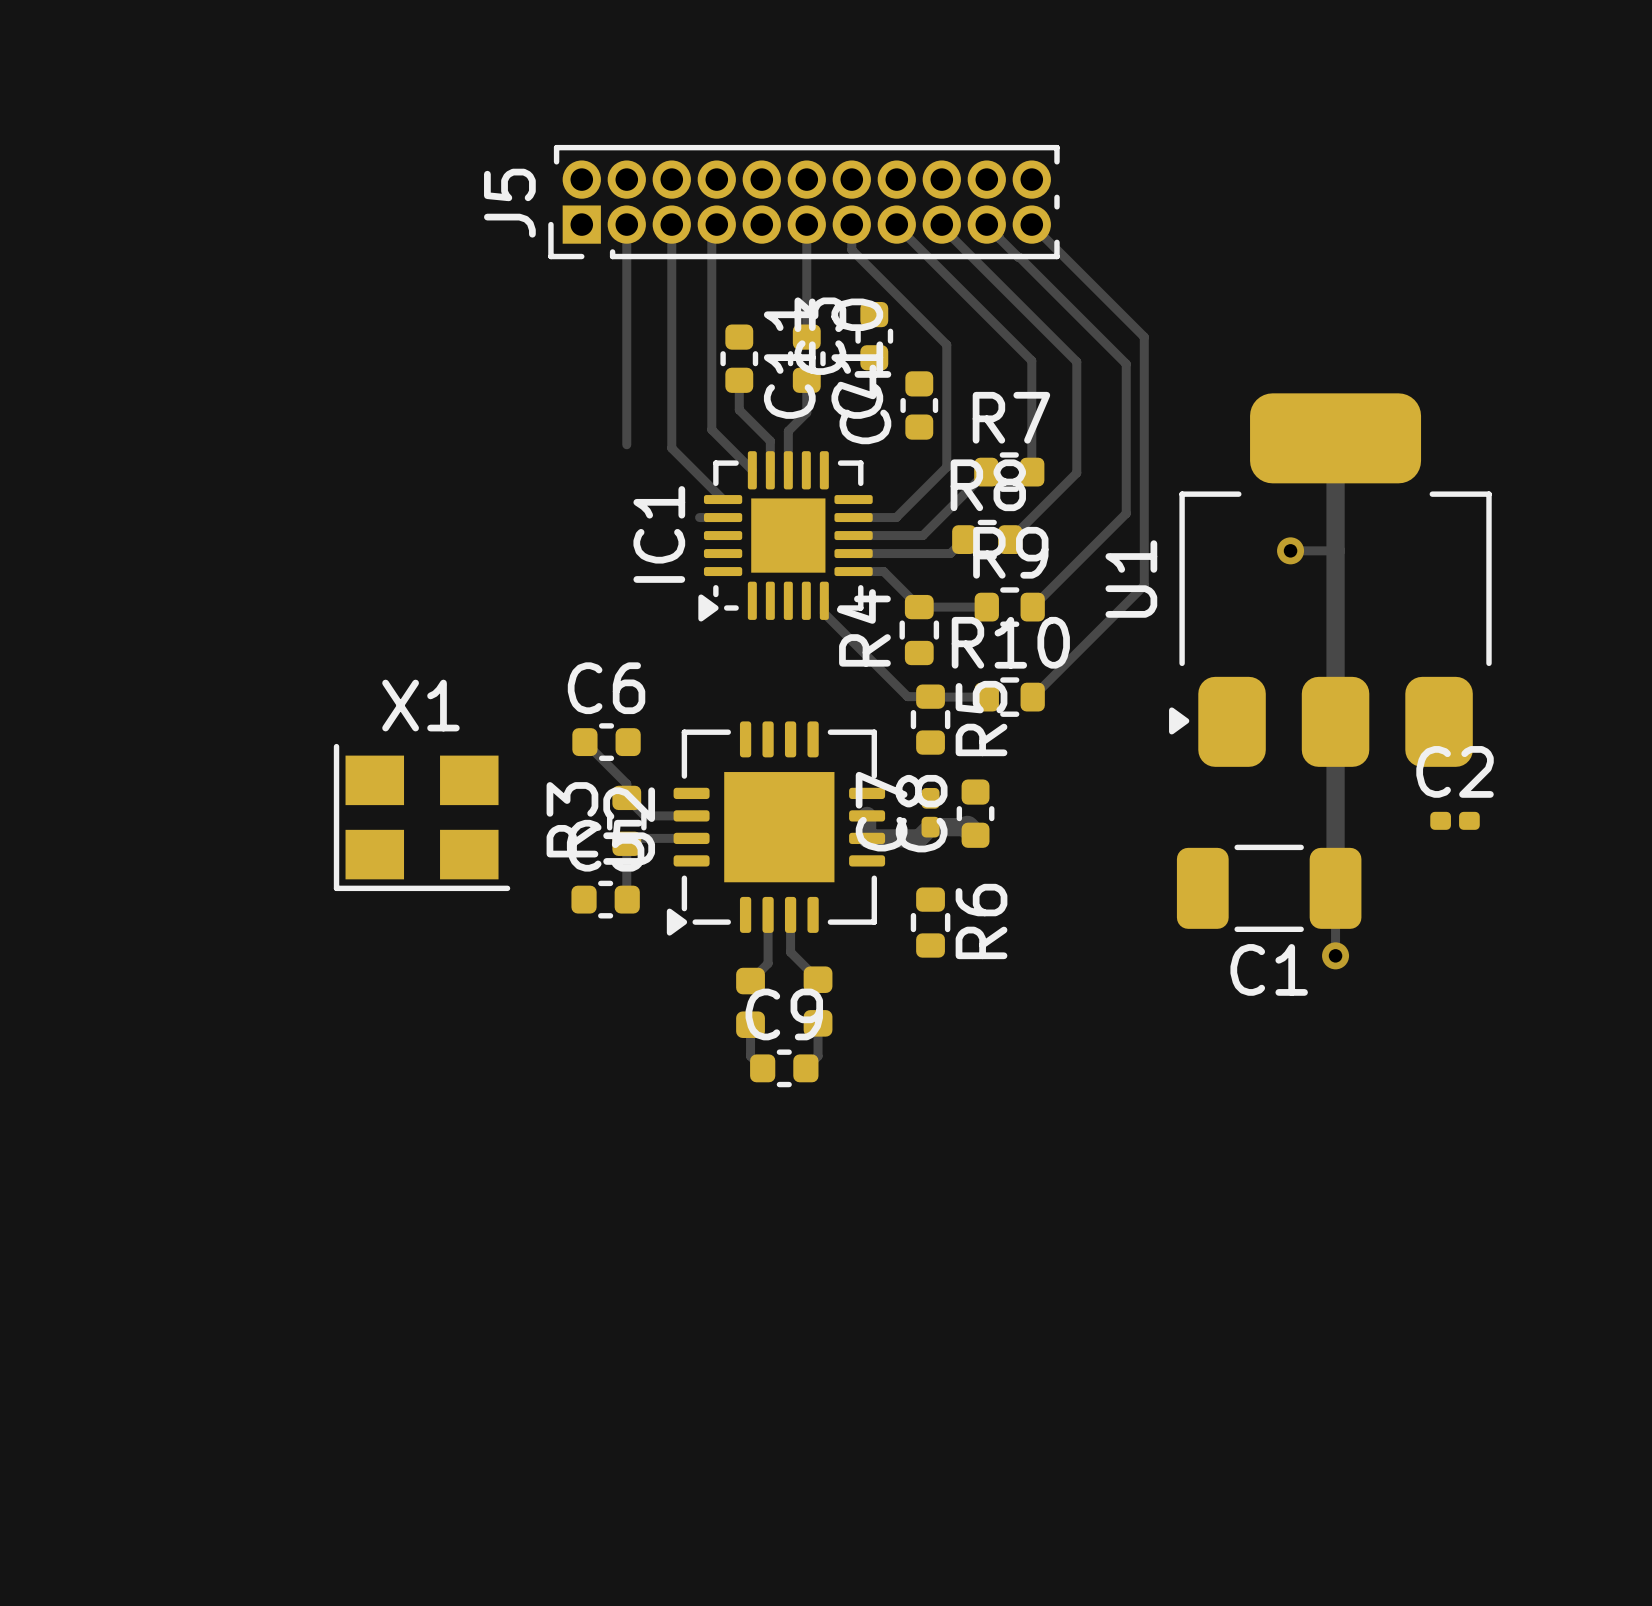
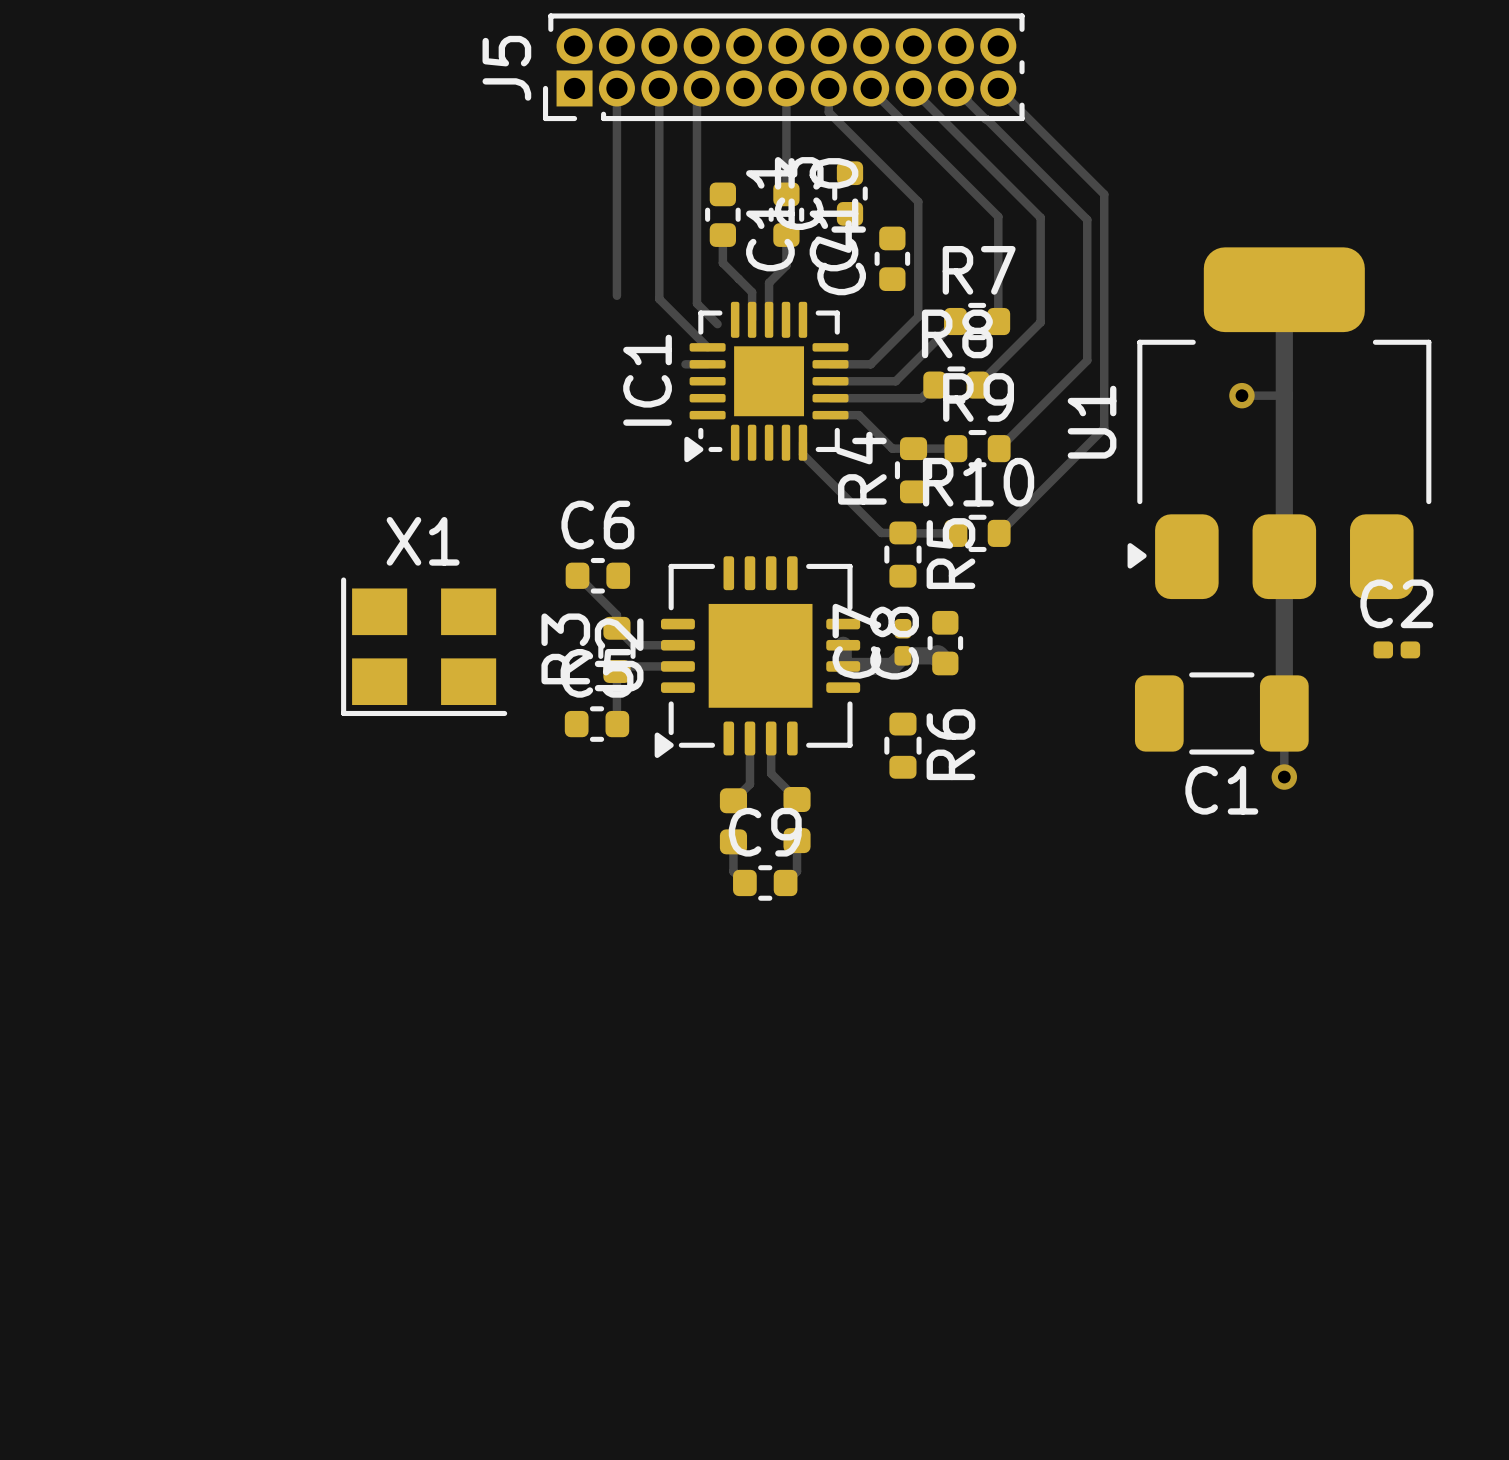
track: (711, 429) (752, 470) -> (696, 281) (696, 303) (717, 324)
R4 position: (919, 630) -> (913, 470)

